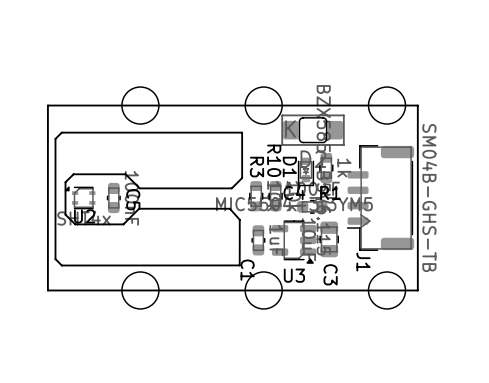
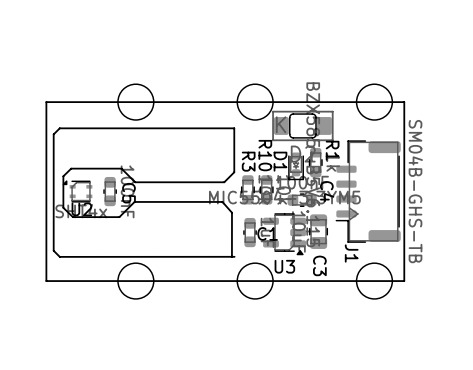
C4 name rotation: 0° (294, 192) -> 90° clockwise (327, 191)
C4 name position: C4 (294, 192) -> C4 (327, 191)
R1 name rotation: 0° (330, 192) -> 90° clockwise (332, 150)
R1 name position: R1 (330, 192) -> R1 (332, 150)
C1 name rotation: 0° (247, 270) -> 90° counterclockwise (267, 233)
C1 name position: C1 (247, 270) -> C1 (267, 233)

